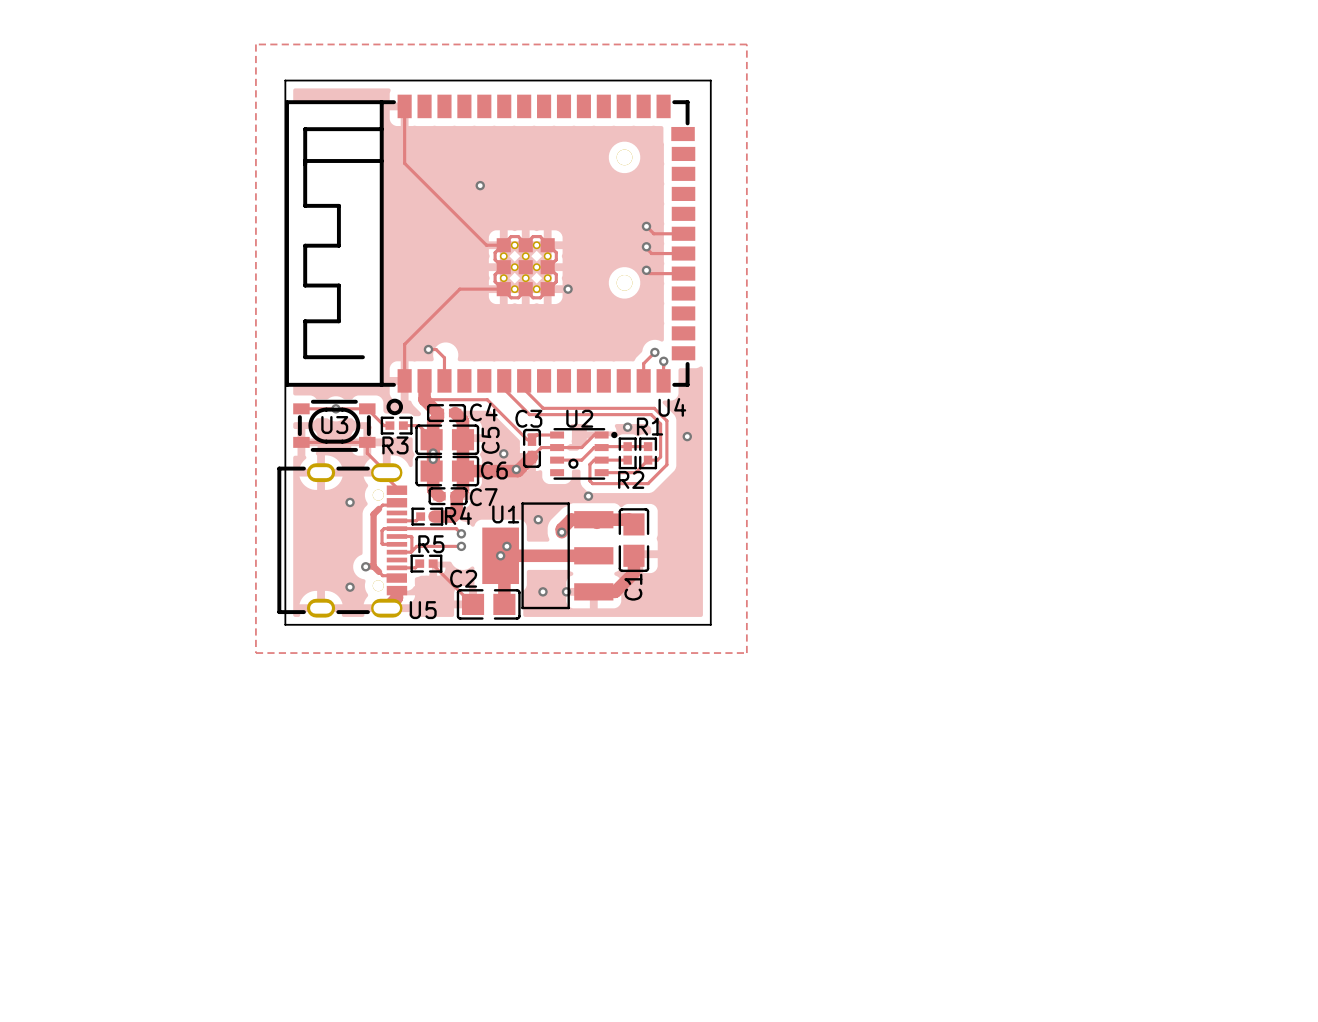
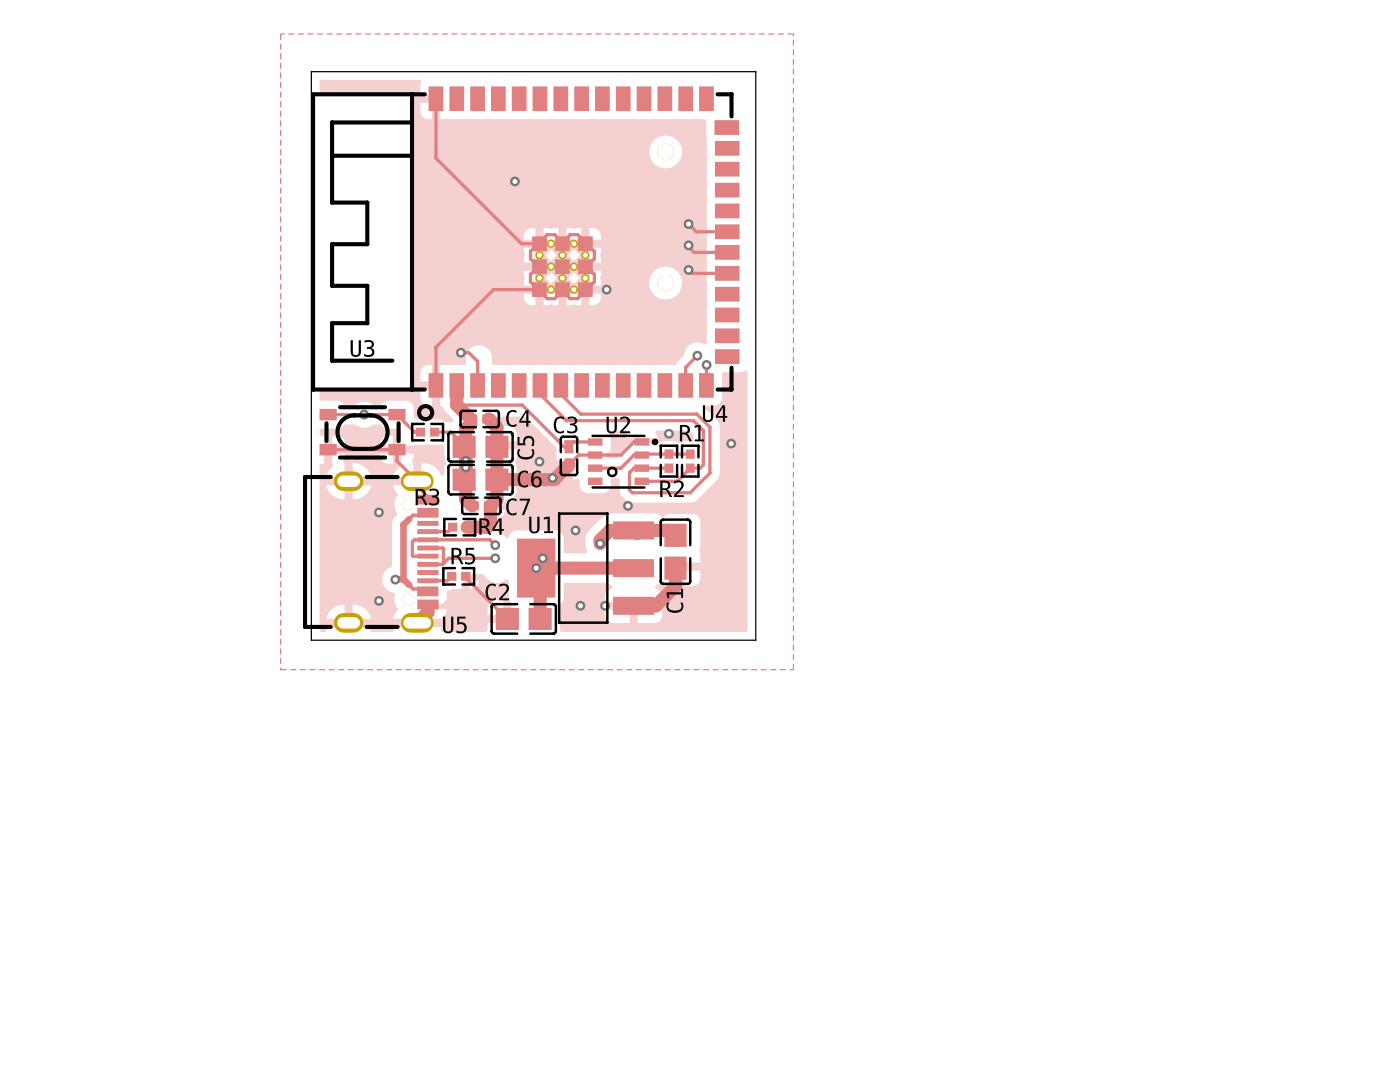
U3 name position: U3 (334, 425) -> U3 (362, 348)
R3 name position: R3 (395, 445) -> R3 (427, 497)

